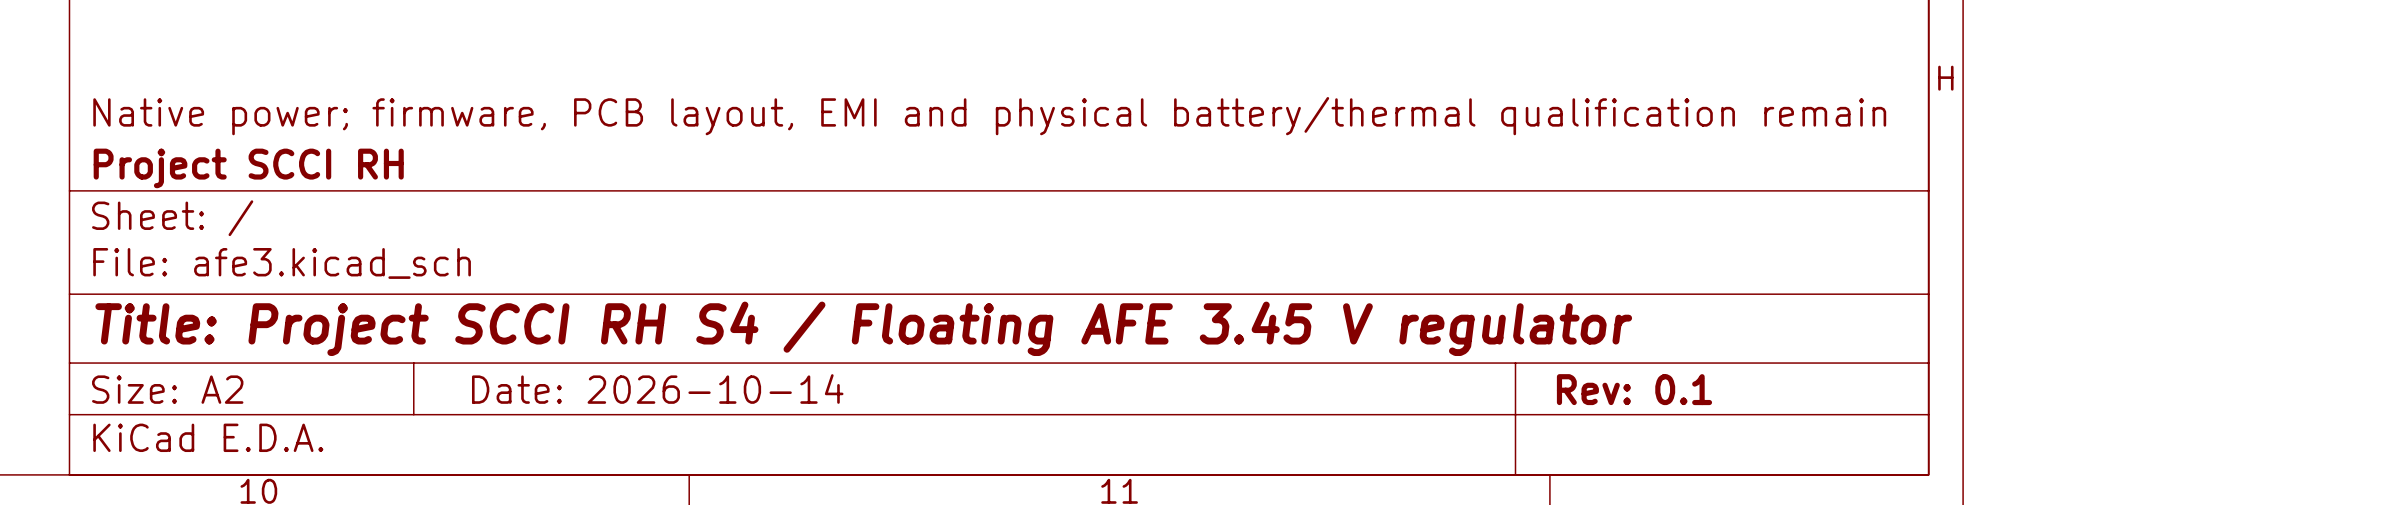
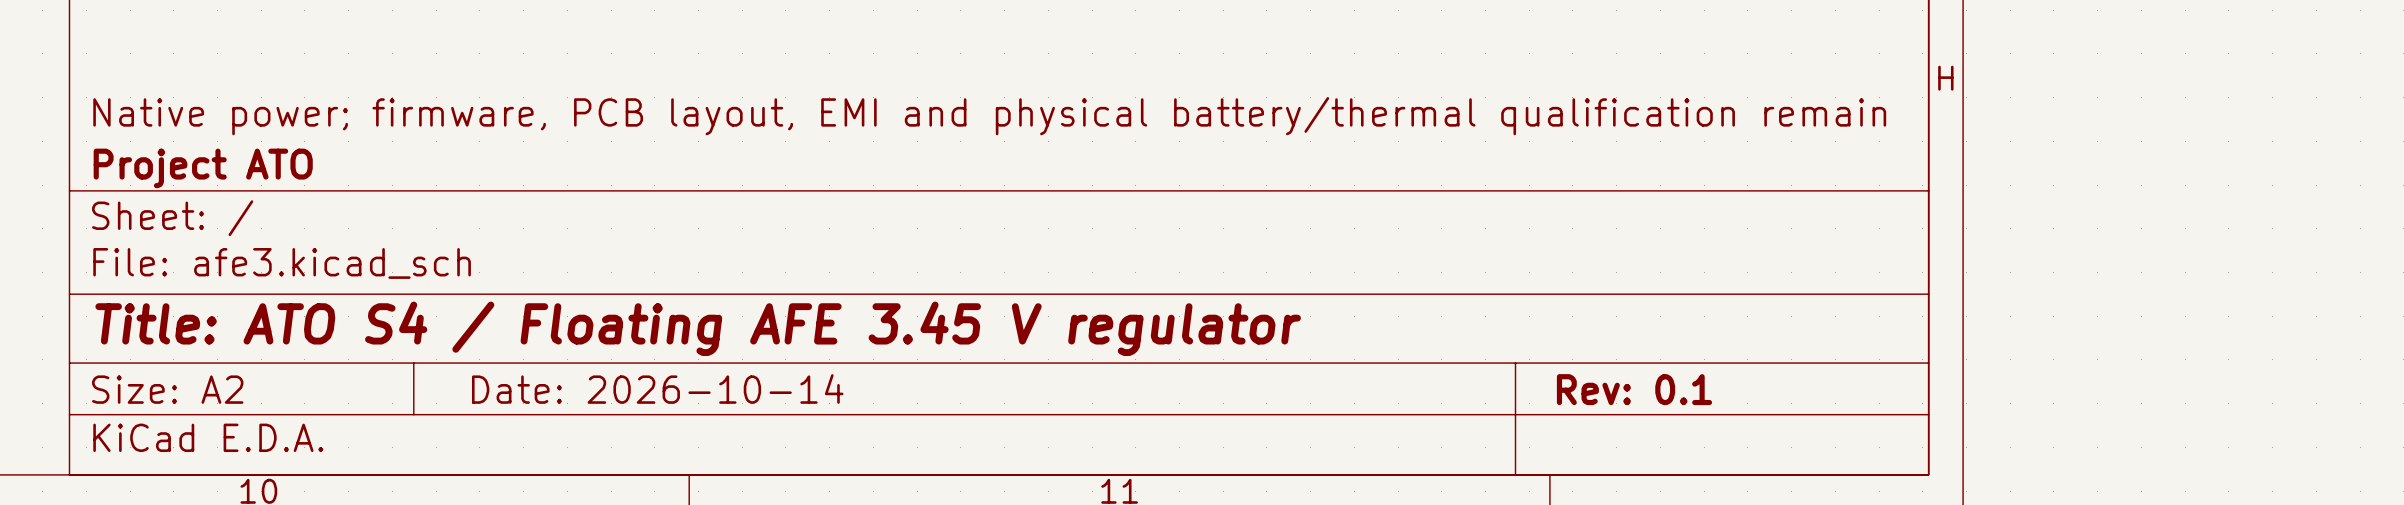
title block: Project SCCI RH (248, 168) -> Project ATO (203, 168)
title block: Title: Project SCCI RH S4 / Floating AFE 3.45 V regulator (863, 328) -> Title: ATO S4 / Floating AFE 3.45 V regulator (698, 328)

